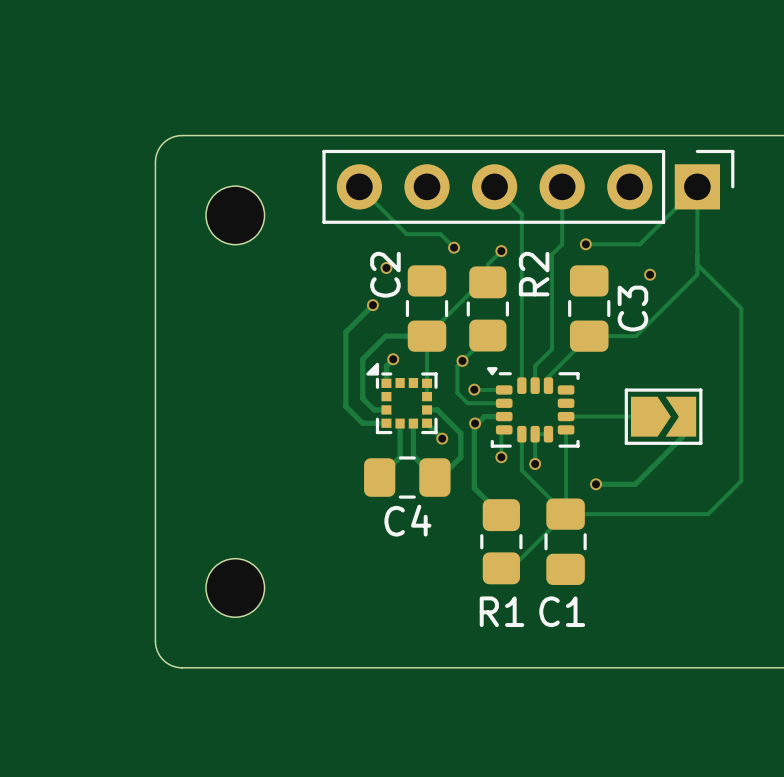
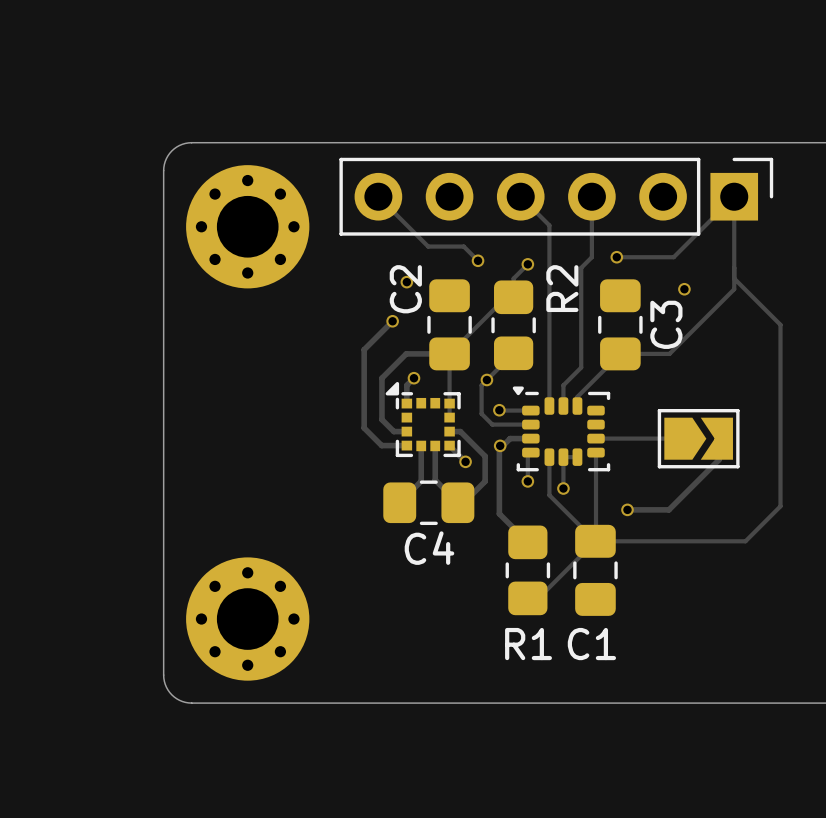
part footprint: [206, 186, 265, 245] -> [186, 165, 310, 289]
part footprint: [206, 558, 265, 618] -> [186, 557, 310, 681]

